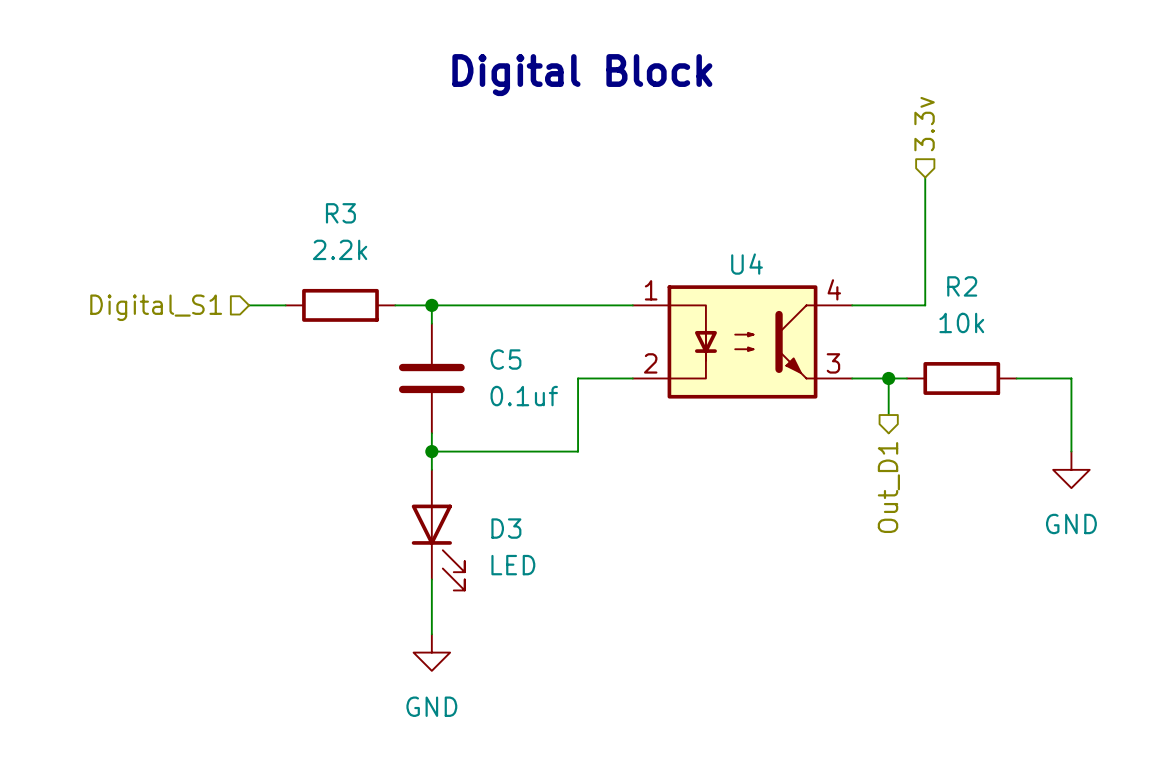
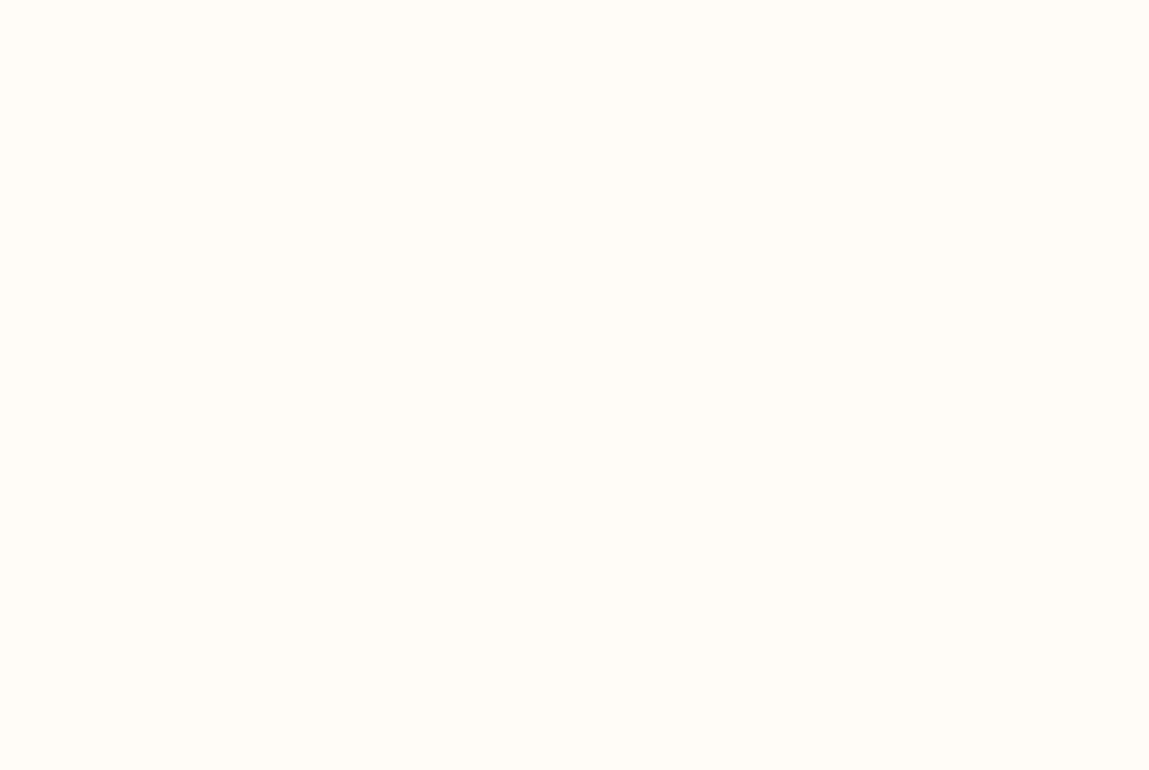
text: Digital Block (582, 75) -> none
hierarchical label: 3.3v (924, 124) -> none
wire: (925, 177) (925, 305) (852, 305) -> none
wire: (249, 305) (285, 305) -> none
R3: 2.2k (340, 305) -> none
wire: (395, 305) (632, 305) -> none
wire: (431, 305) (431, 323) -> none
junction: (431, 305) -> none
hierarchical label: Digital_S1 (156, 307) -> none
U4: (742, 341) -> none
C5: 0.1uf (431, 378) -> none
wire: (632, 378) (578, 378) (578, 451) (431, 451) -> none
wire: (852, 378) (906, 378) -> none
wire: (888, 378) (888, 415) -> none
junction: (888, 378) -> none
R2: 10k (961, 378) -> none
wire: (1016, 378) (1071, 378) (1071, 451) -> none
wire: (431, 433) (431, 469) -> none
junction: (431, 451) -> none
power symbol: GND (1071, 469) -> none
hierarchical label: Out_D1 (888, 487) -> none
D3: LED (438, 530) -> none
wire: (431, 579) (431, 634) -> none
power symbol: GND (431, 652) -> none

